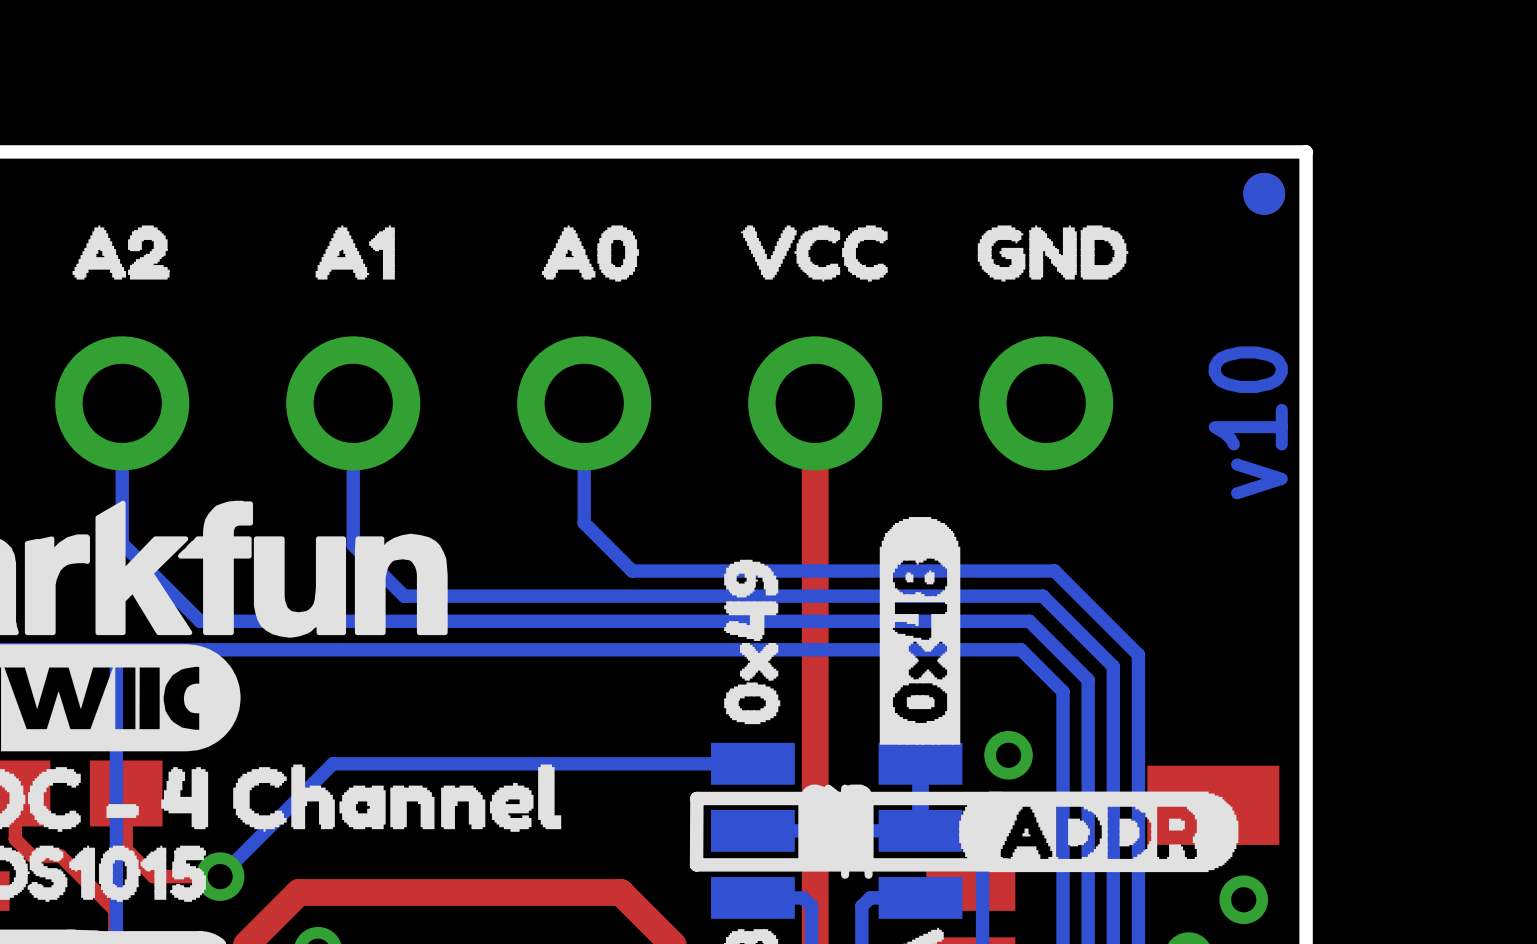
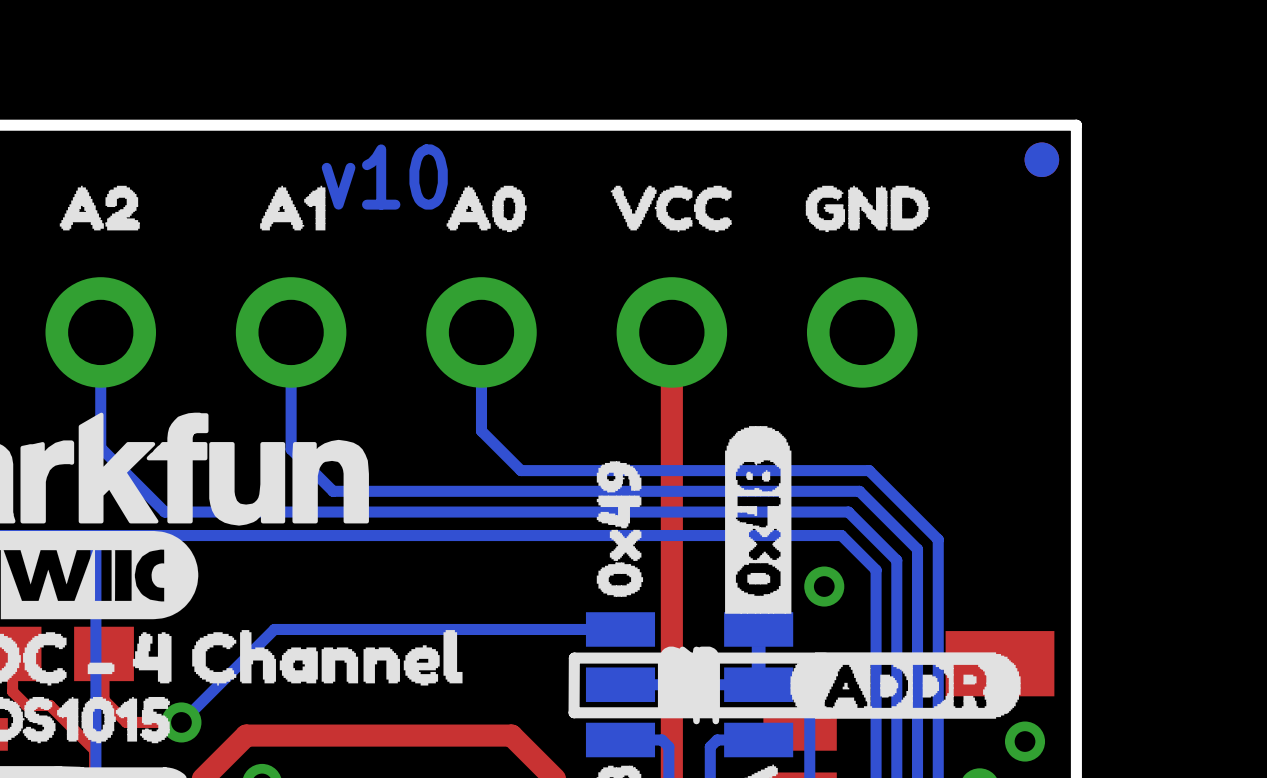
text rotation: 0° (1248, 422) -> 90° clockwise (384, 177)
text position: v10 (1248, 422) -> v10 (384, 177)
via position: (1008, 755) -> (824, 586)

